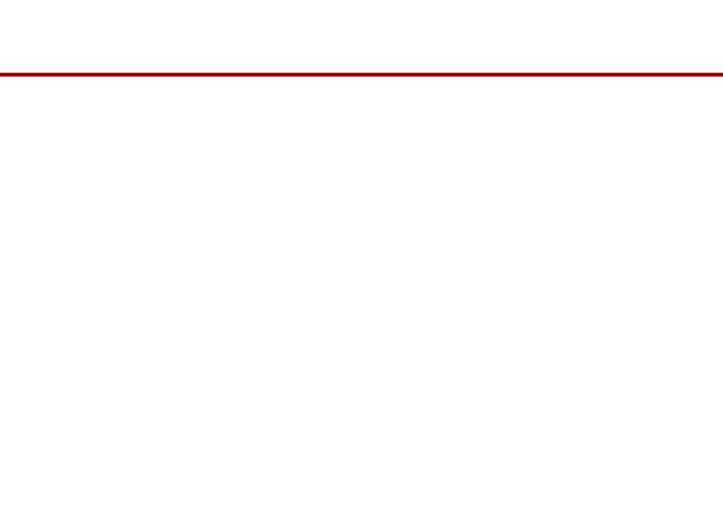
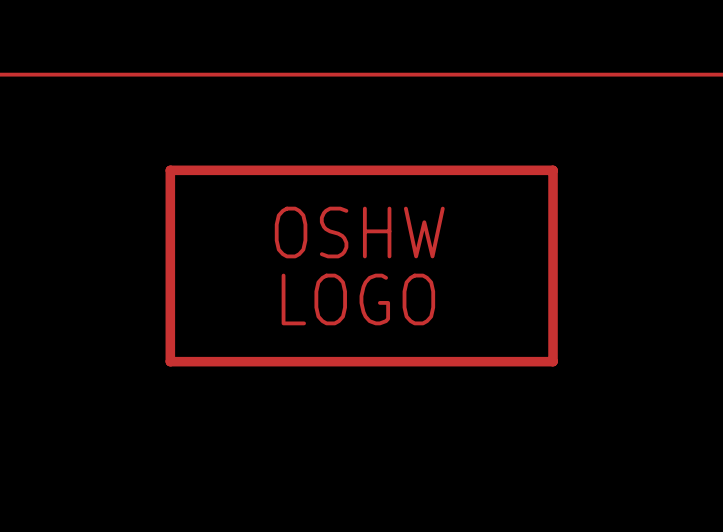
part: none -> (361, 265)

